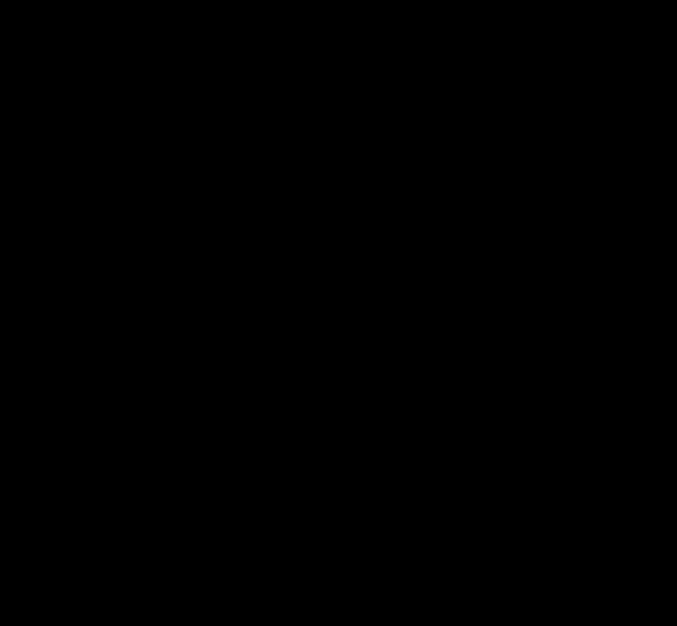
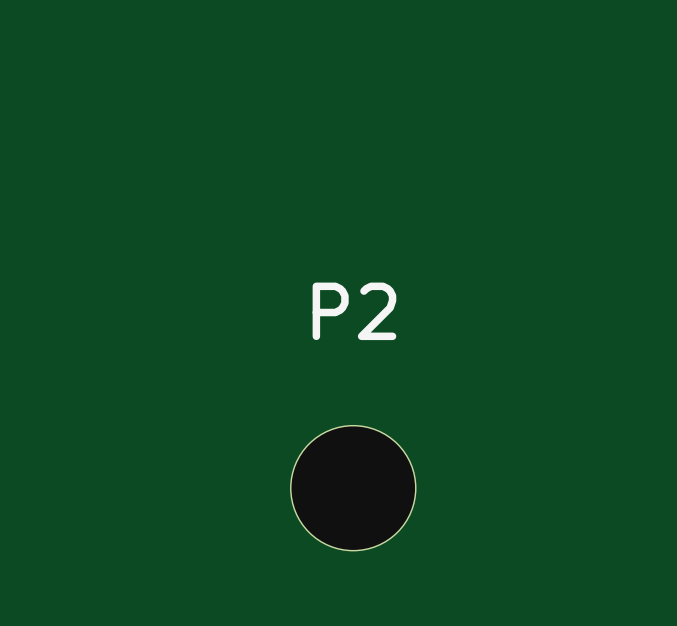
P2: none -> (353, 488)

